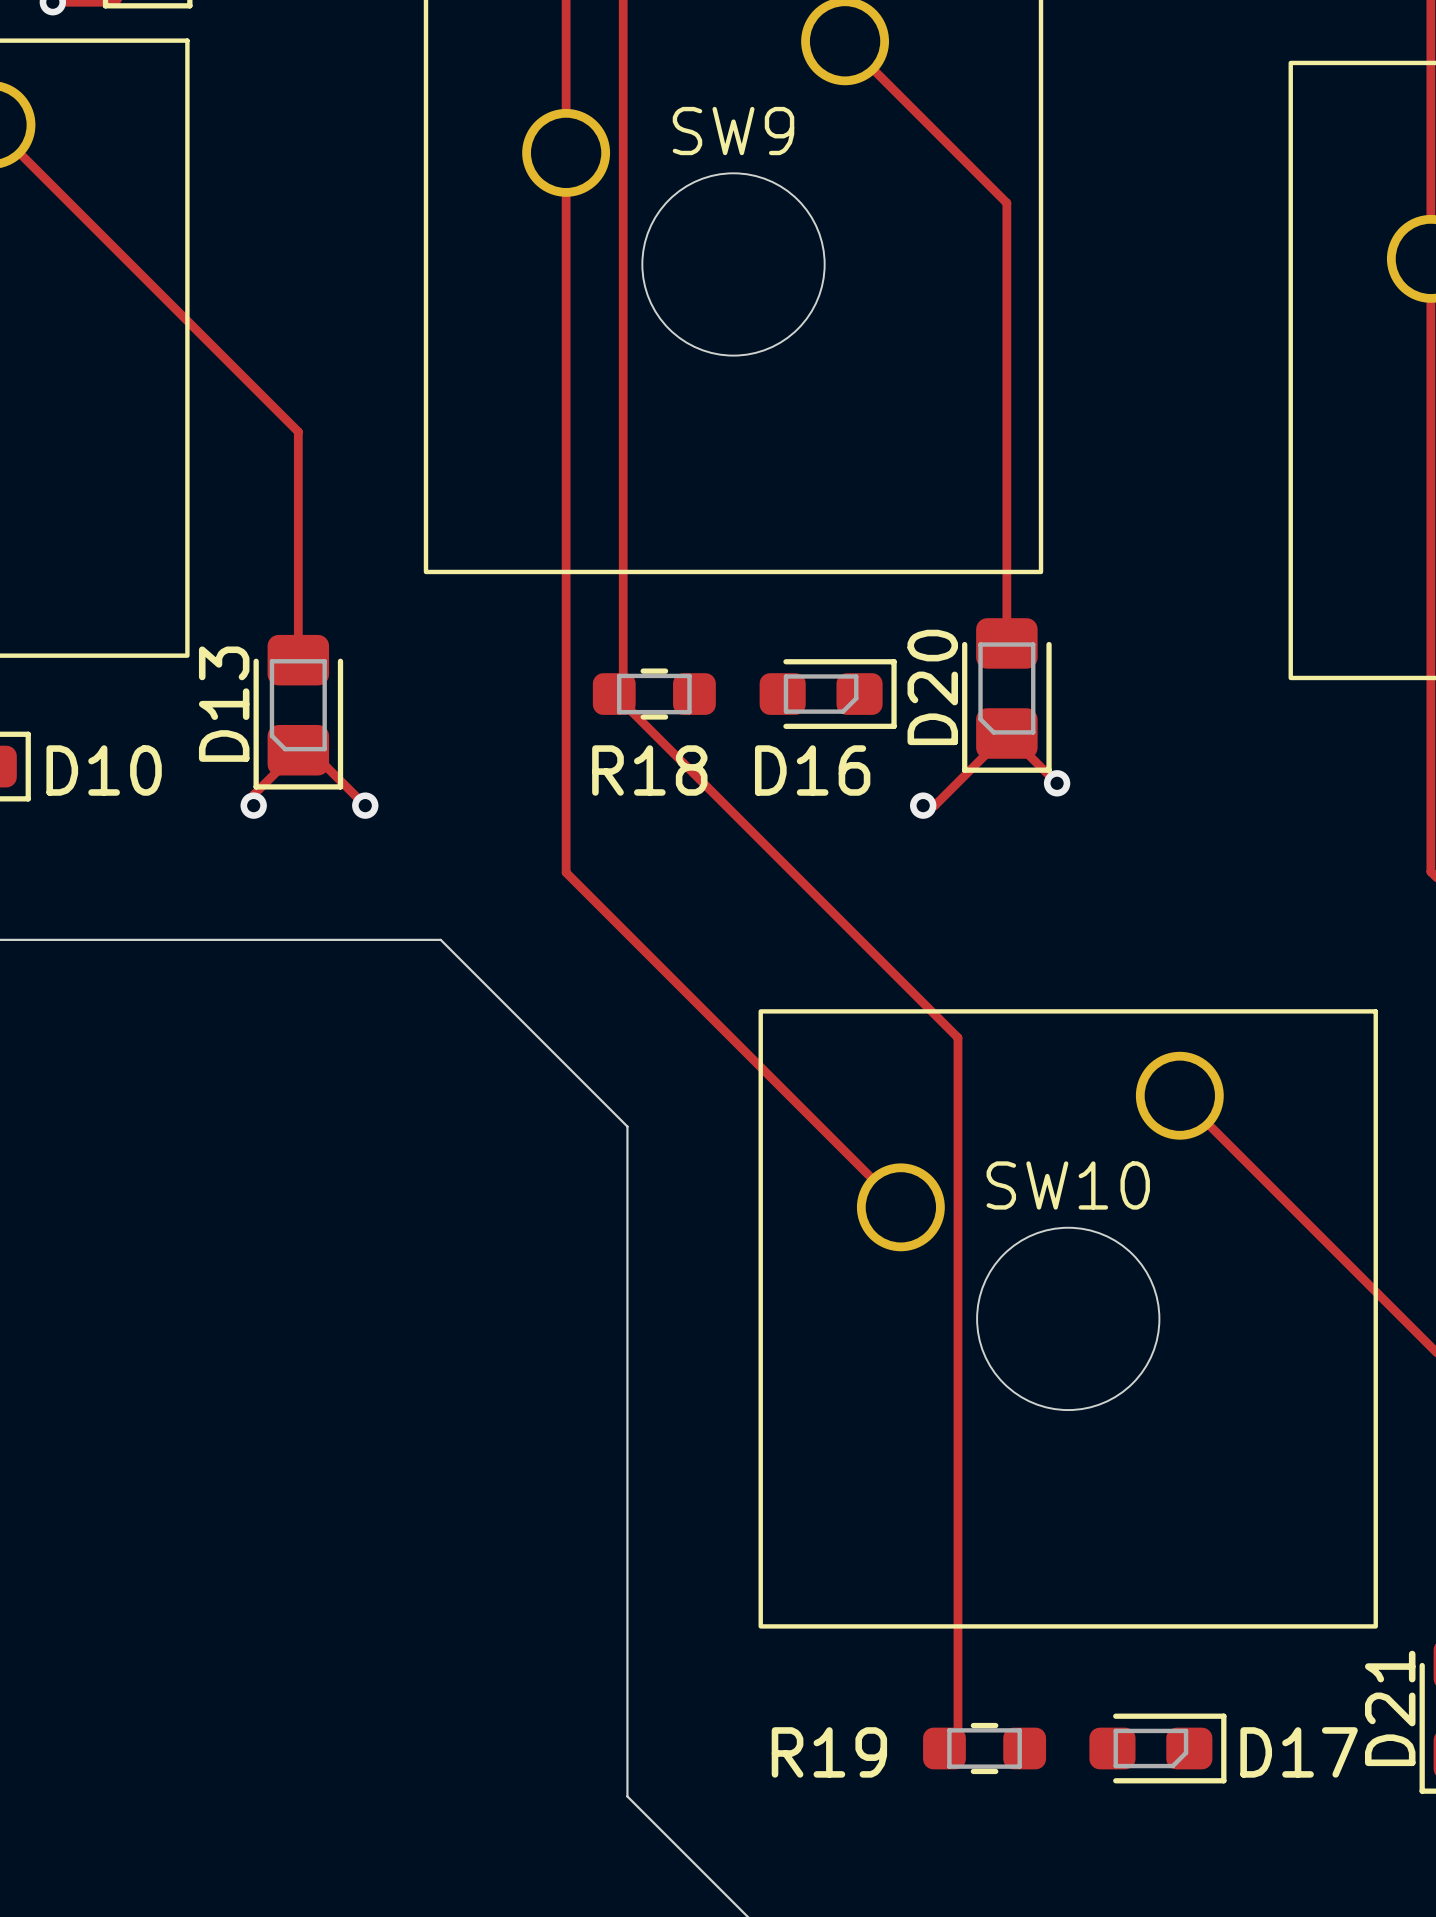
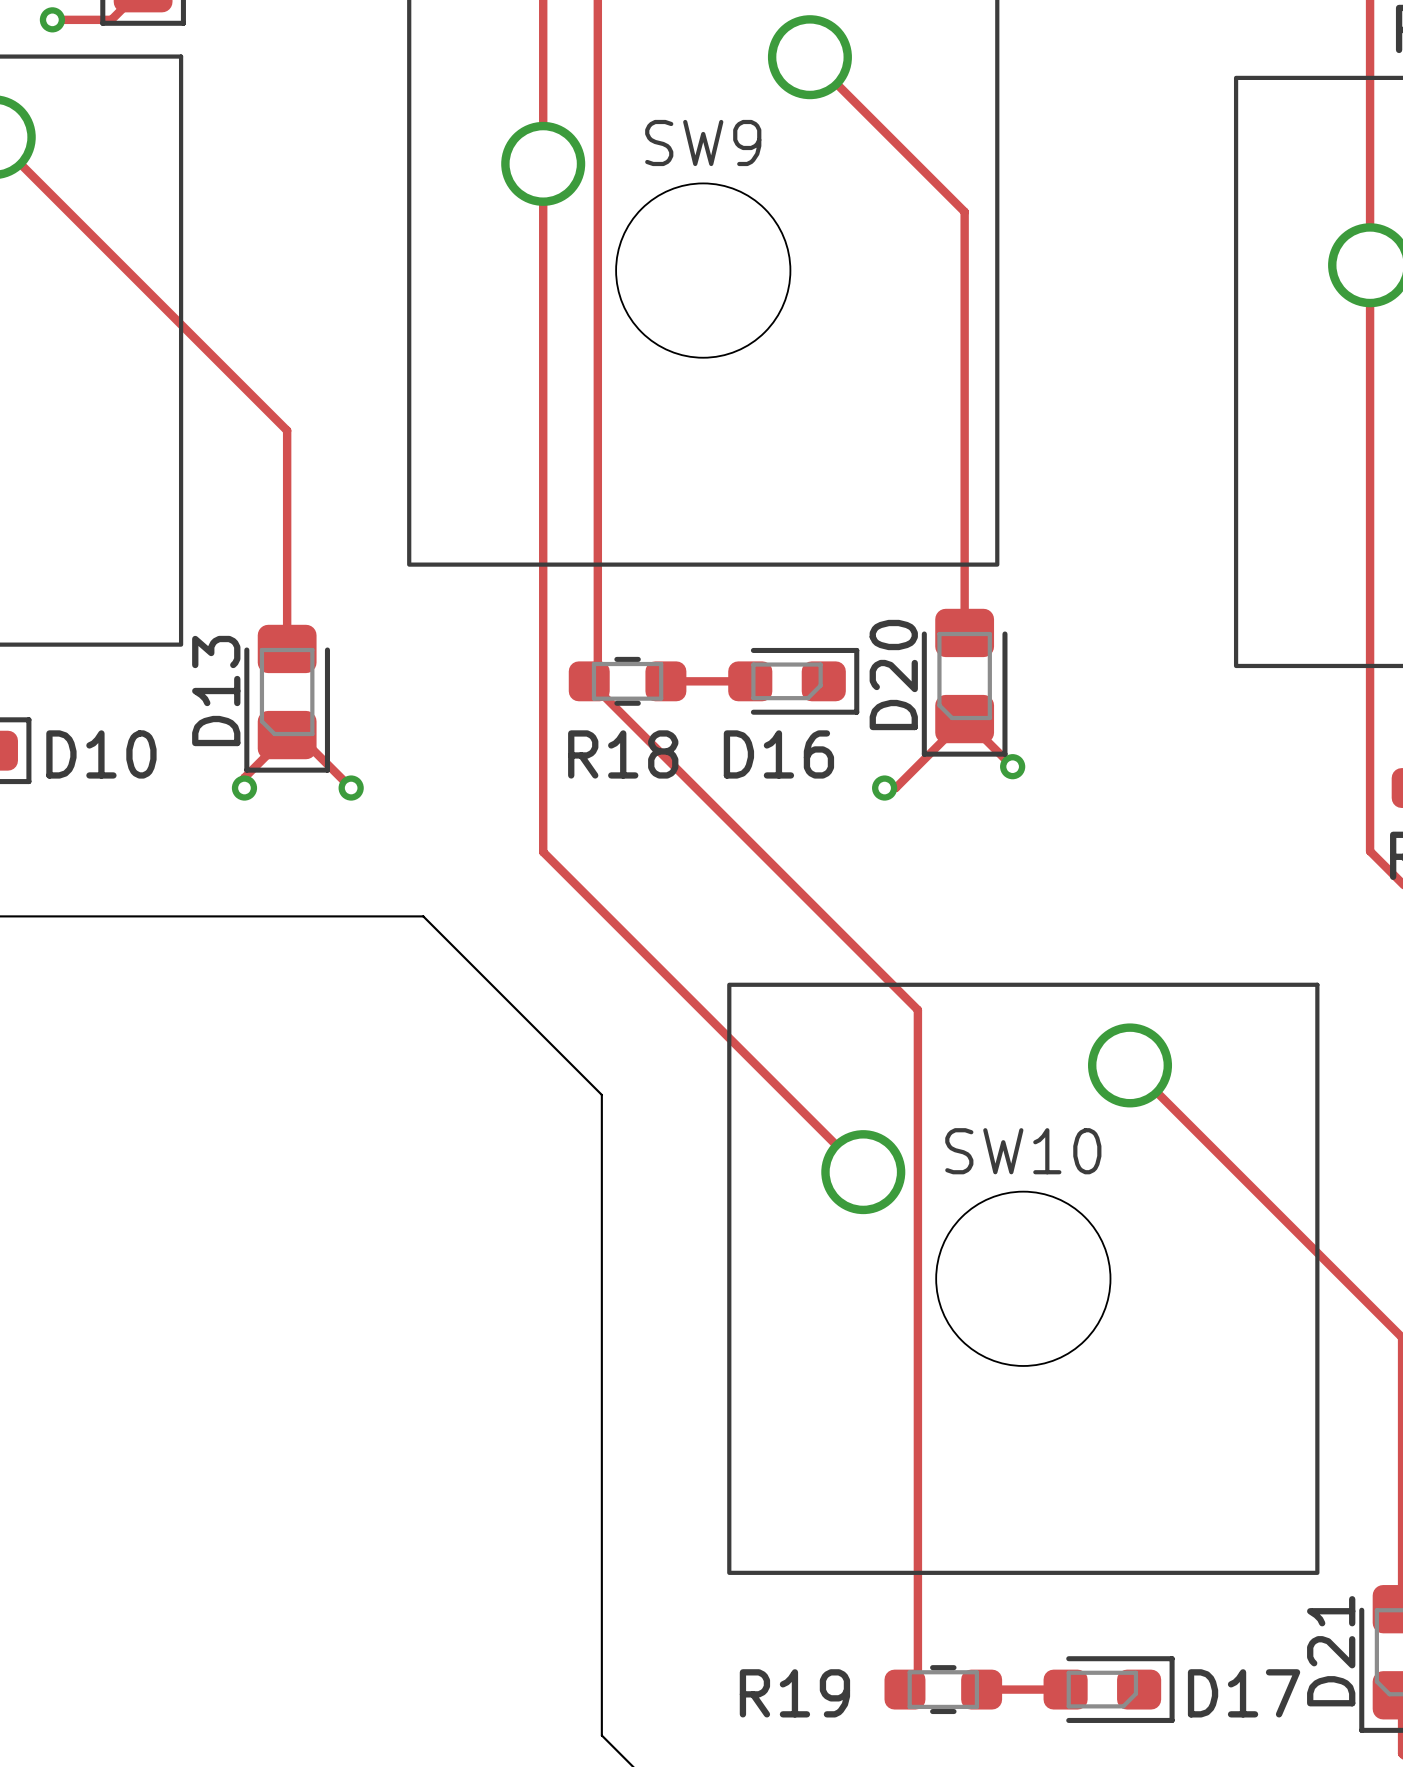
track: none -> (665, 681) (750, 681)
track: none -> (981, 1689) (1065, 1689)

